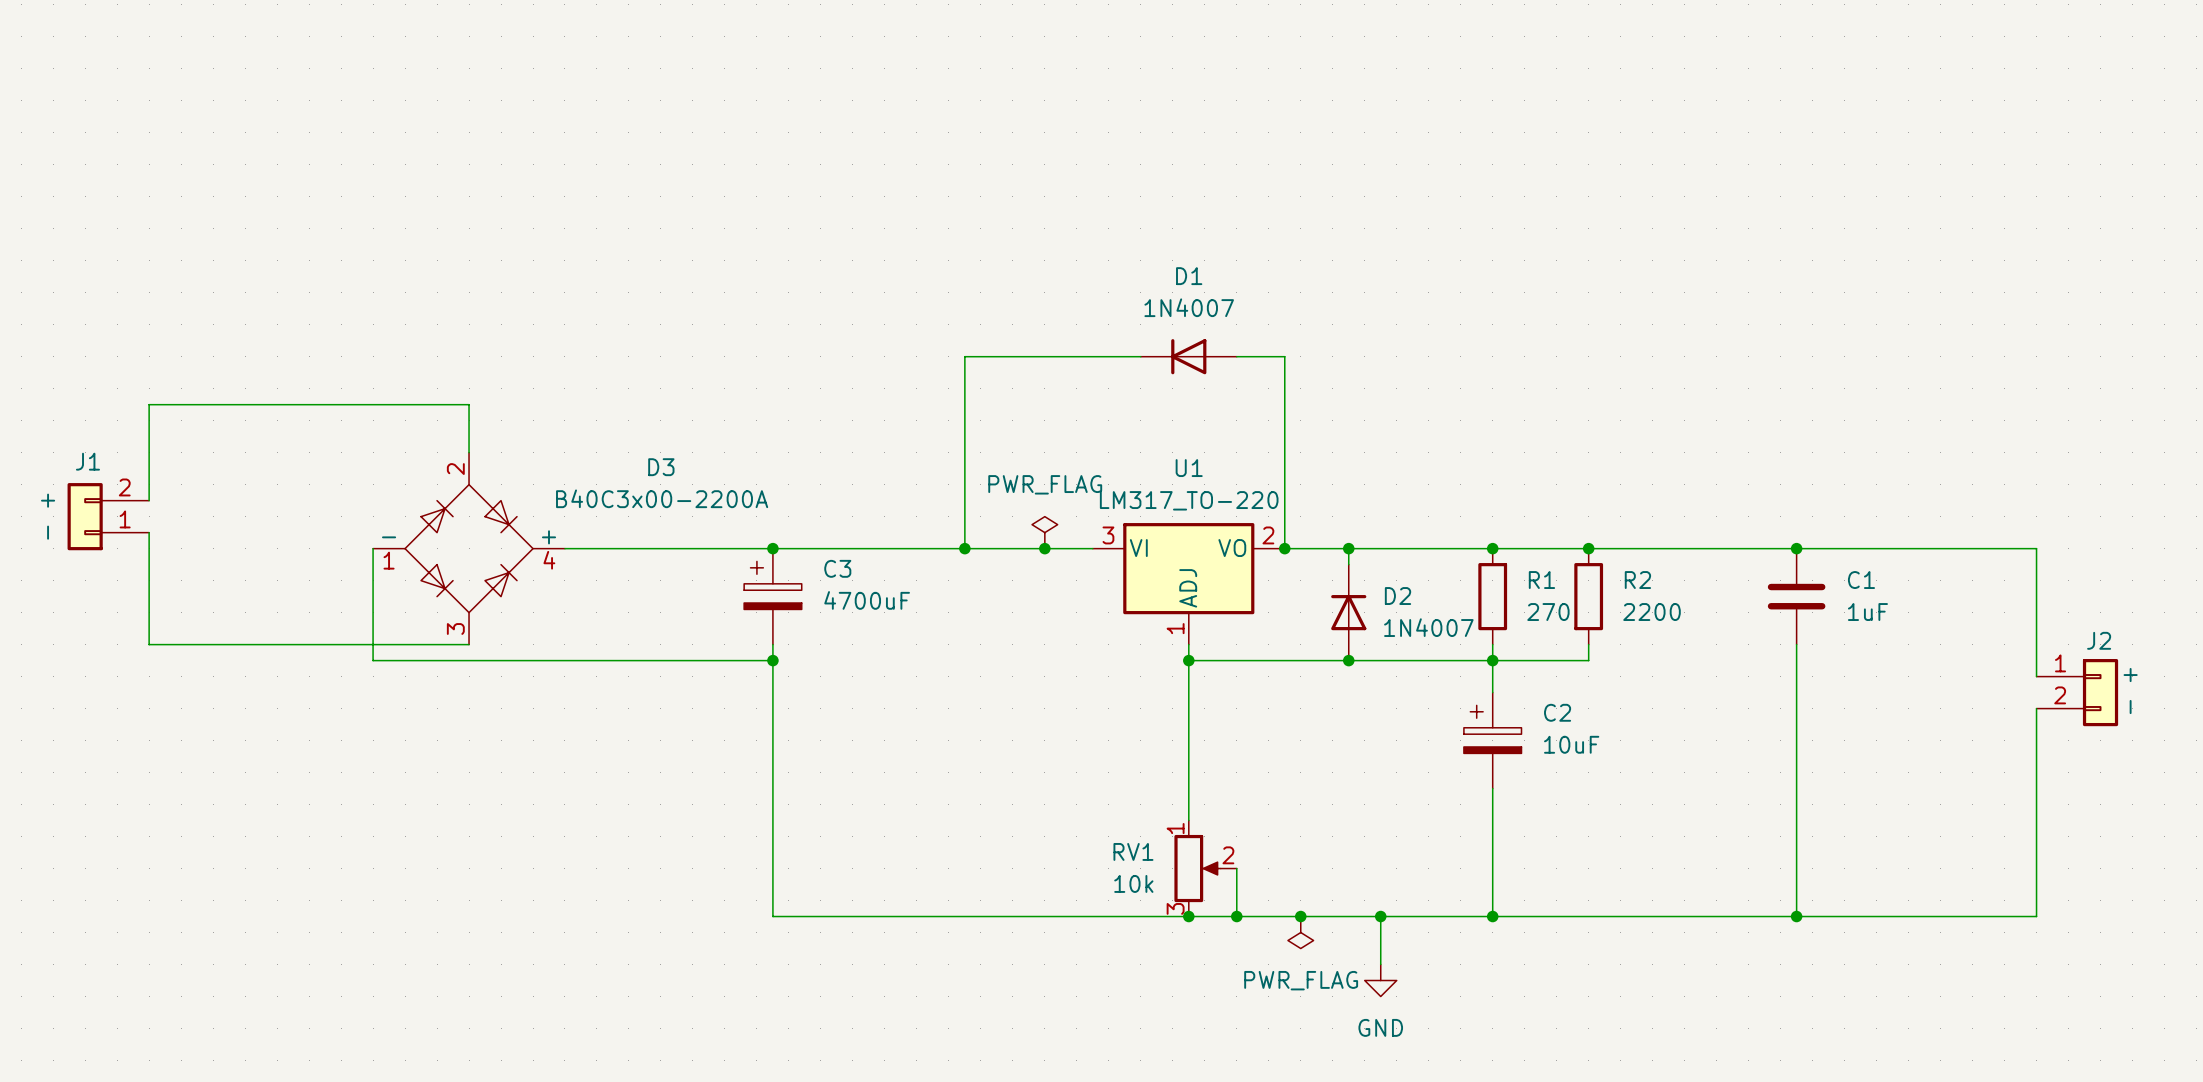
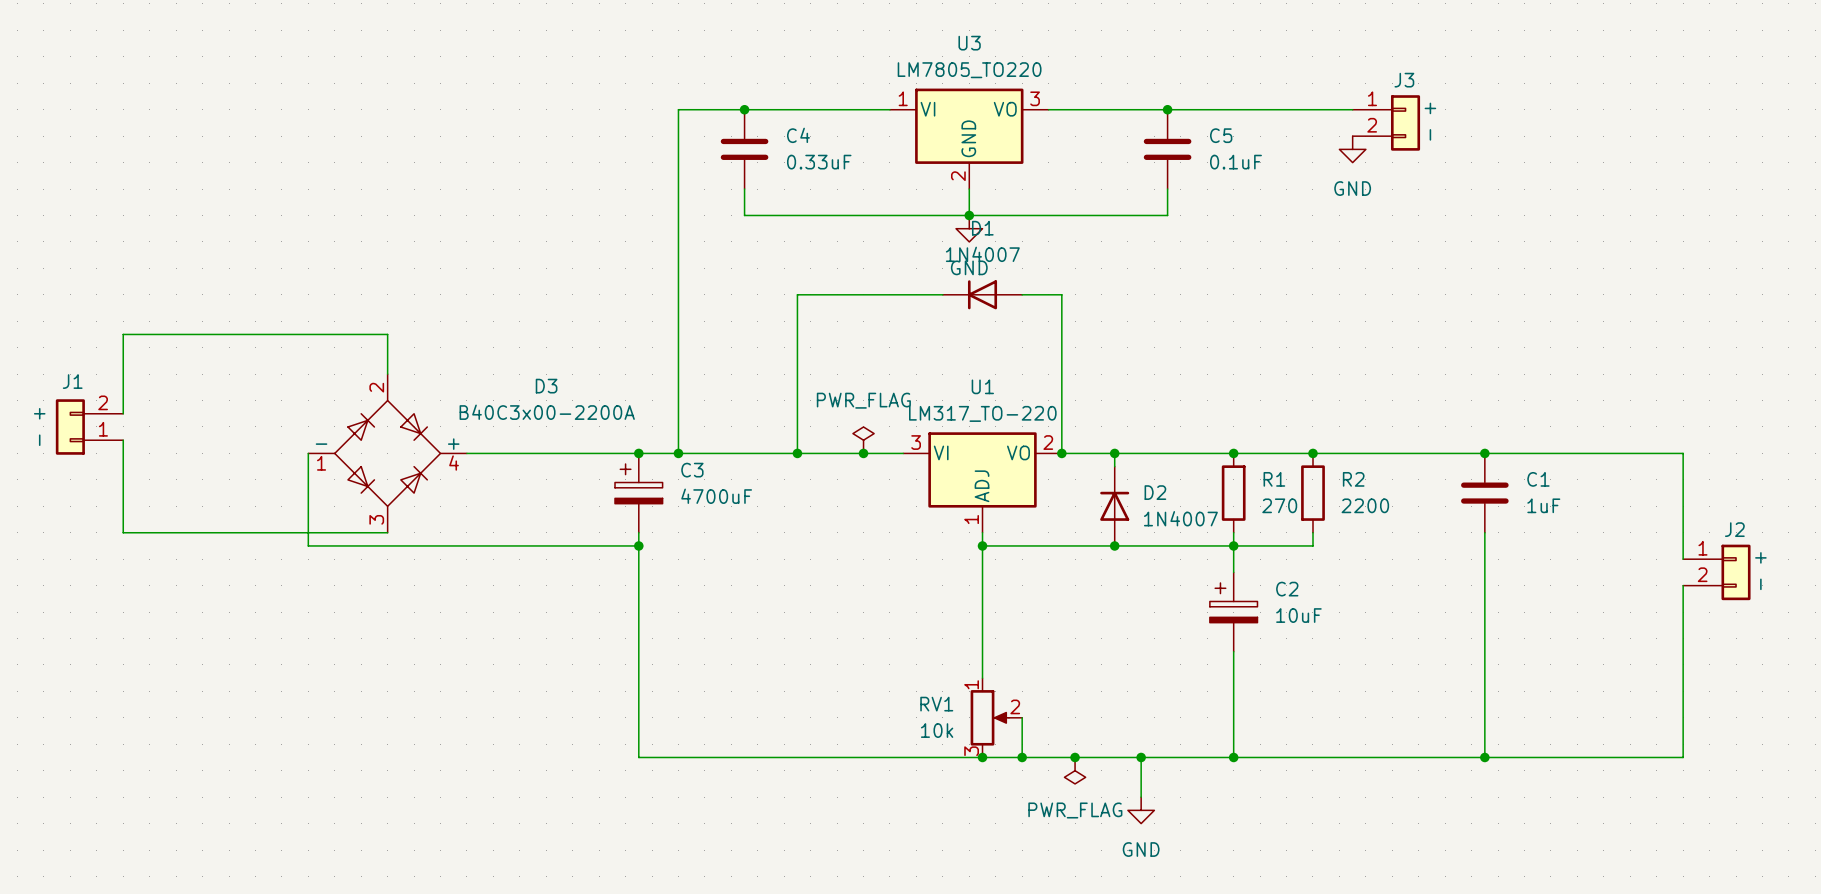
junction: none -> (744, 109)
wire: none -> (889, 109) (678, 109) (678, 453)
wire: none -> (1048, 109) (1352, 109)
junction: none -> (1167, 109)
J3: none -> - + (1386, 122)
U3: none -> LM7805_TO220 (969, 138)
C4: none -> 0.33uF (744, 149)
C5: none -> 0.1uF (1167, 149)
power symbol: none -> GND (1352, 149)
wire: none -> (744, 189) (744, 215) (1167, 215) (1167, 189)
wire: none -> (969, 189) (969, 215)
junction: none -> (969, 215)
power symbol: none -> GND (969, 228)
junction: none -> (678, 453)

